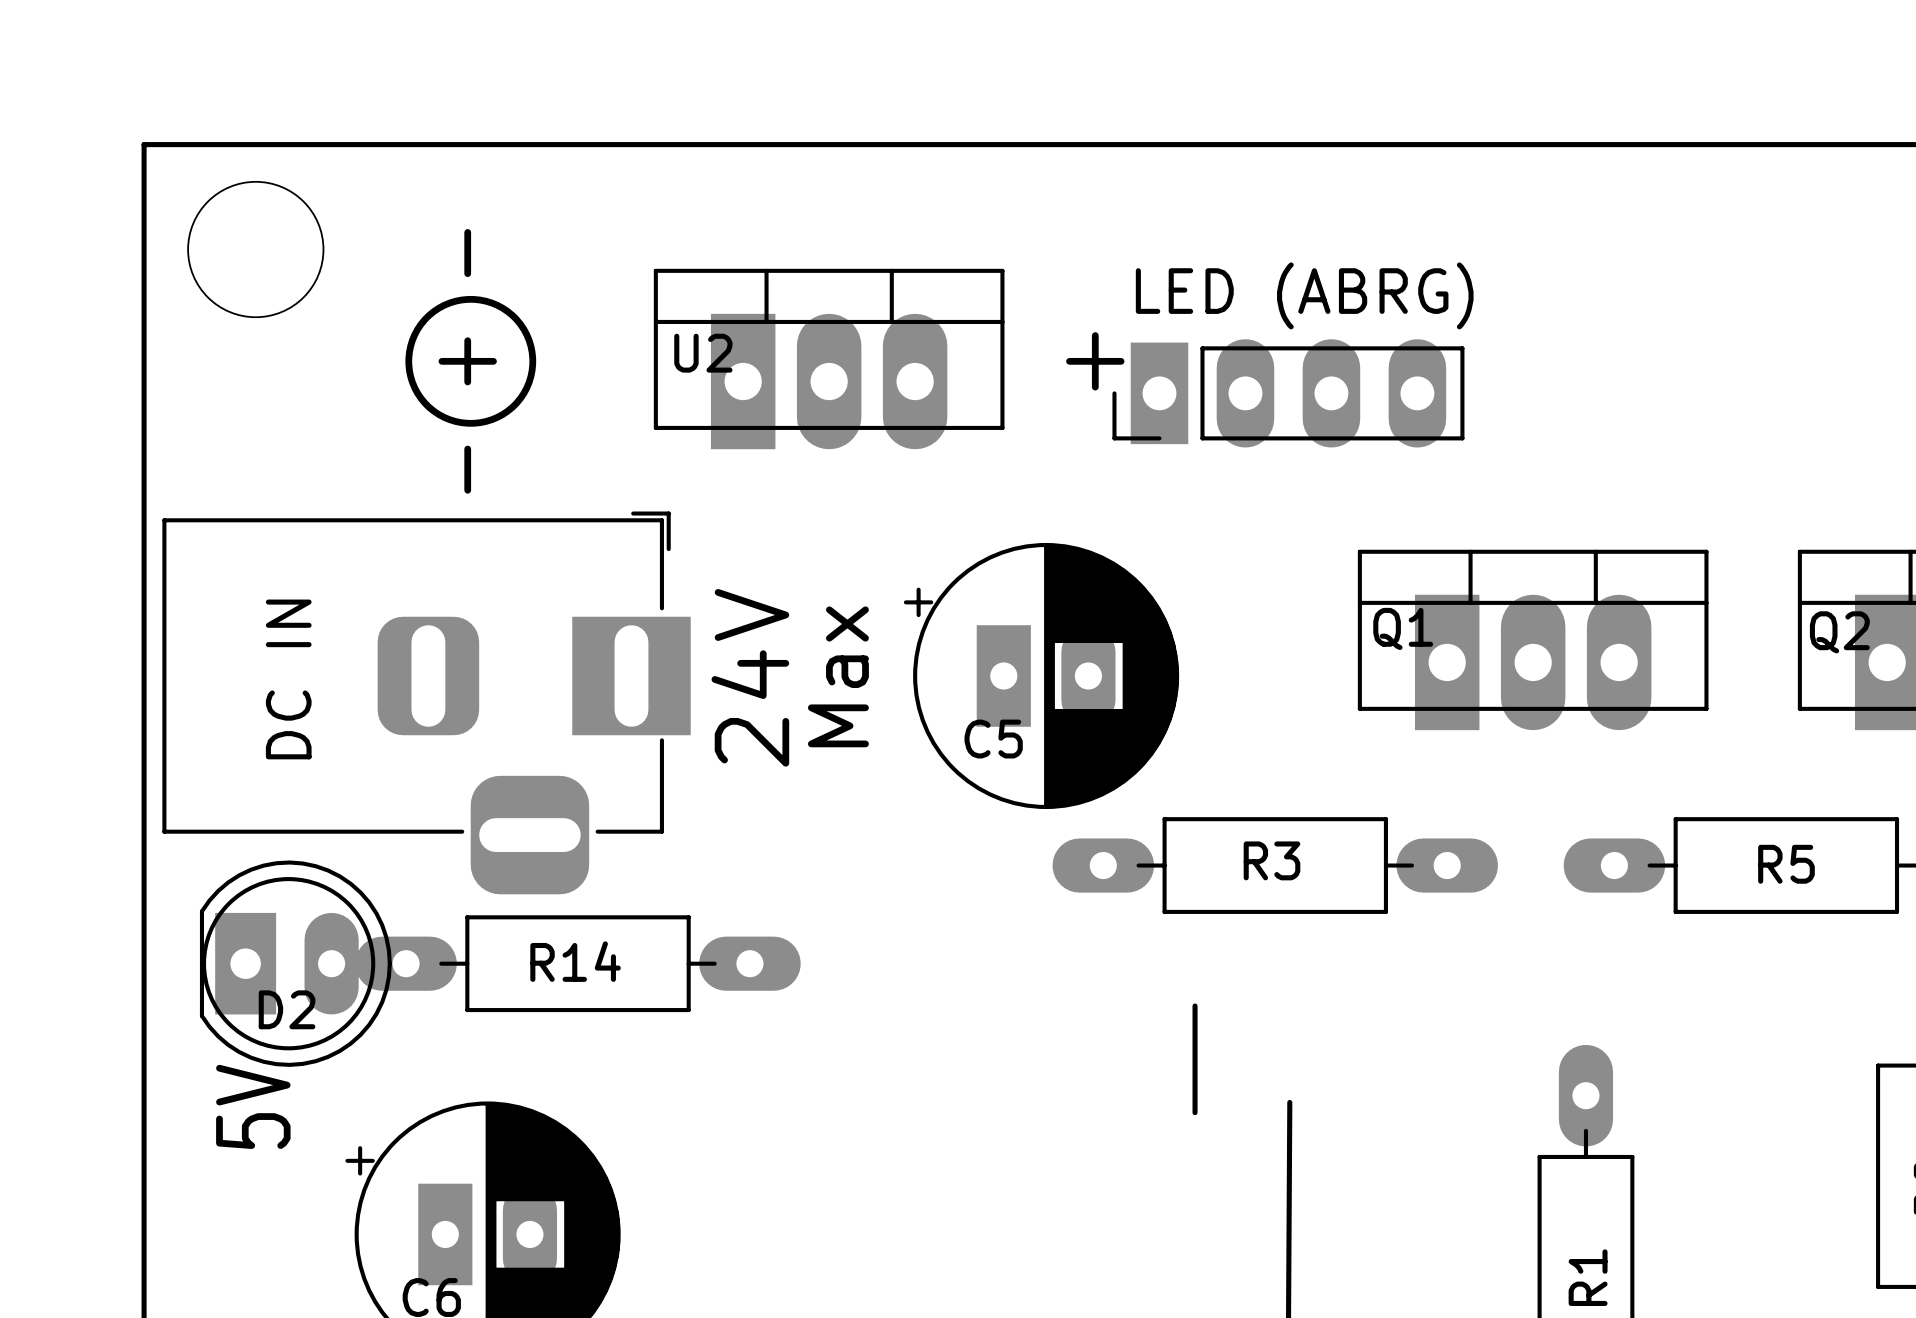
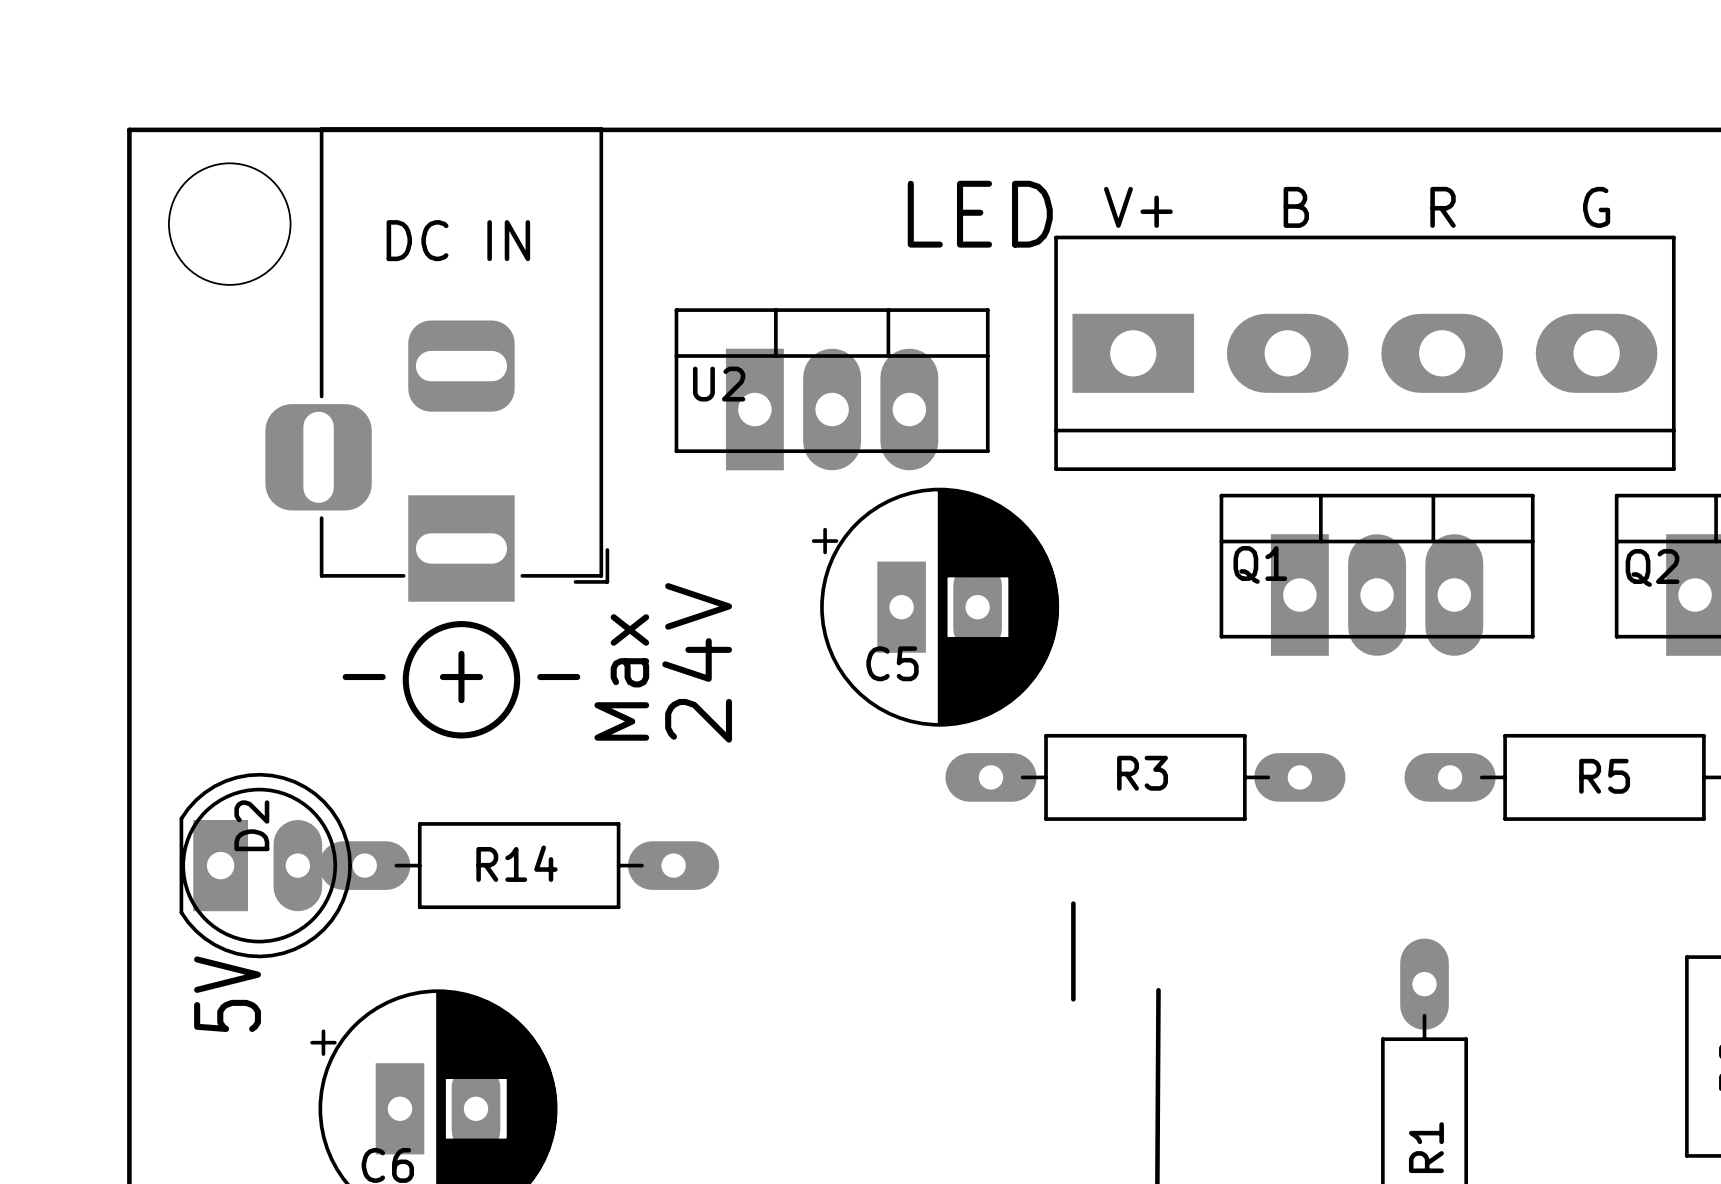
U2 position: (829, 359) -> (832, 389)
drawing position: (470, 361) -> (461, 679)
part: (1288, 393) -> none
part: none -> (1364, 353)
part: none -> (437, 364)
text position: Max (838, 676) -> Max (621, 677)
text position: 24V (750, 677) -> 24V (697, 662)
part: (426, 702) -> none
D2 name rotation: 0° (287, 1009) -> 90° counterclockwise (251, 825)
D2 name position: D2 (287, 1009) -> D2 (251, 825)

